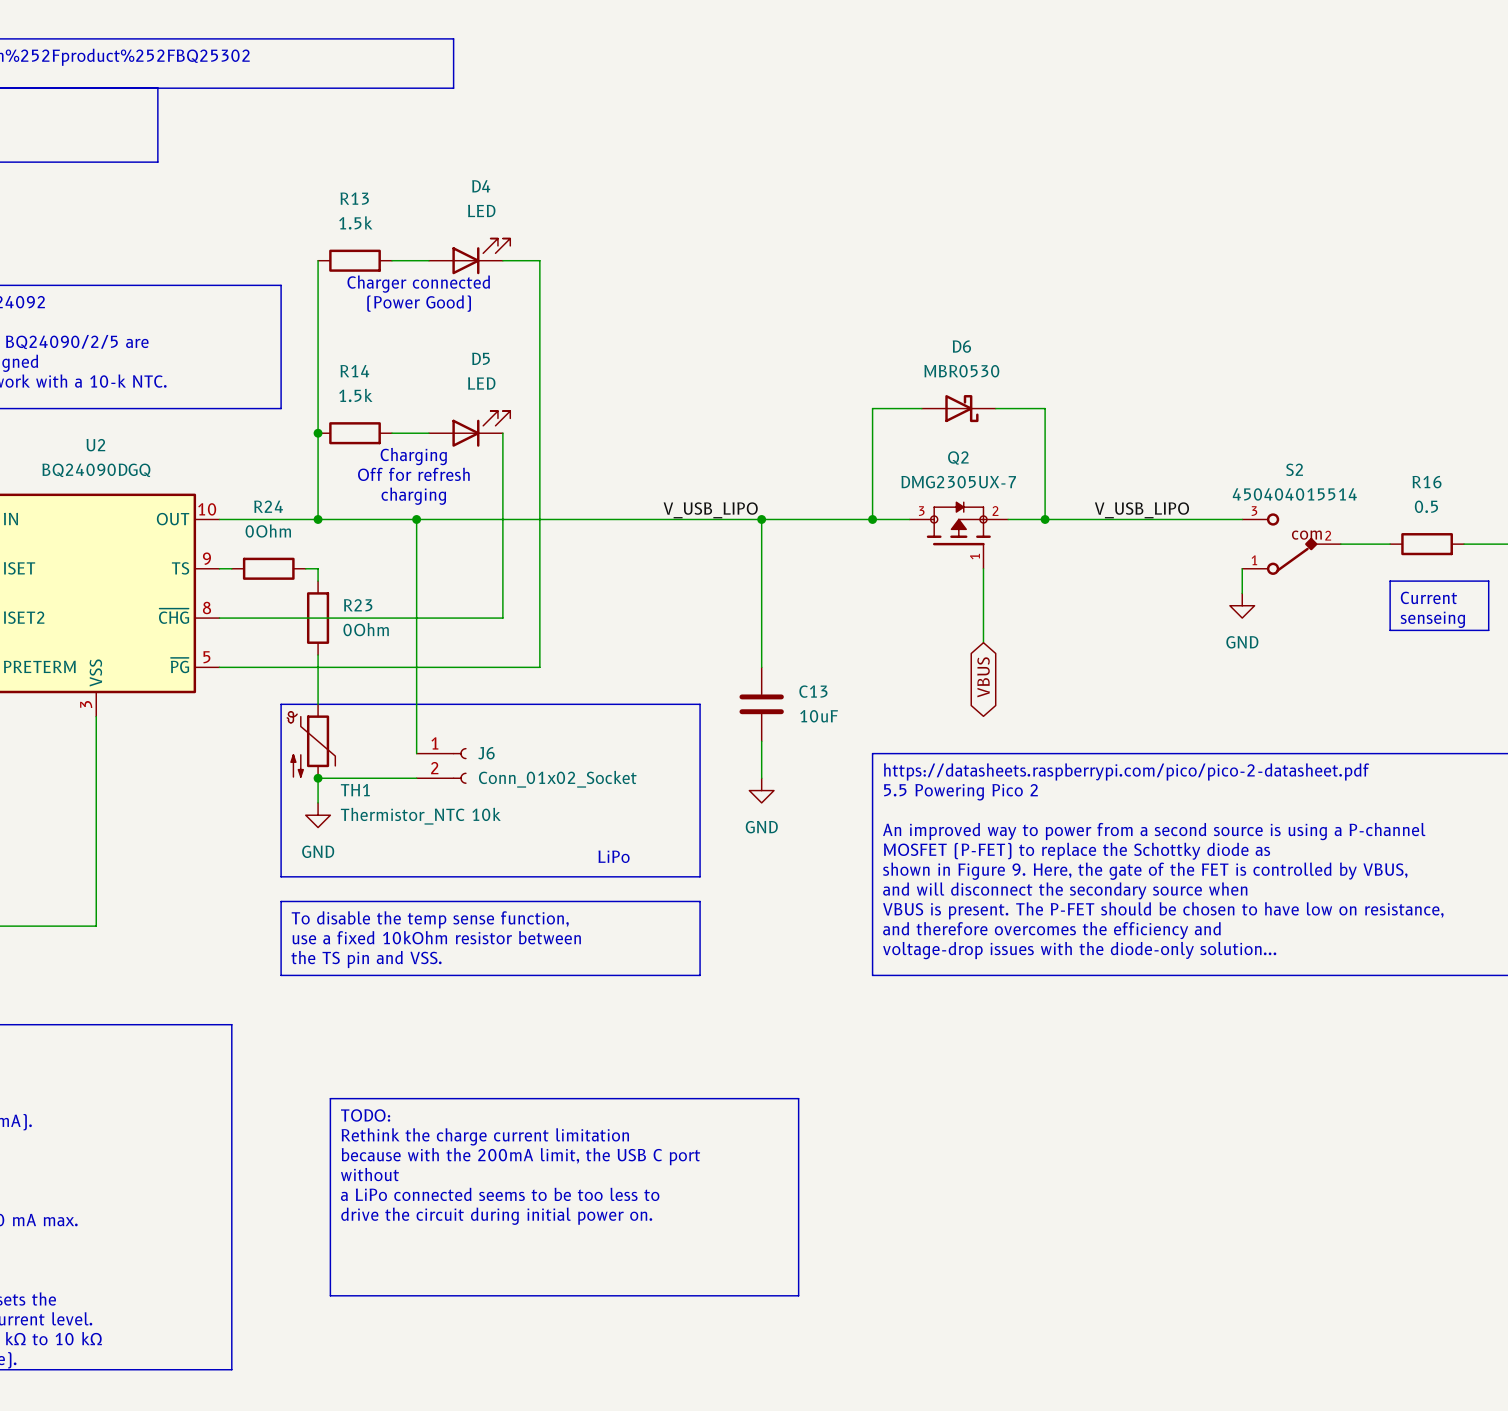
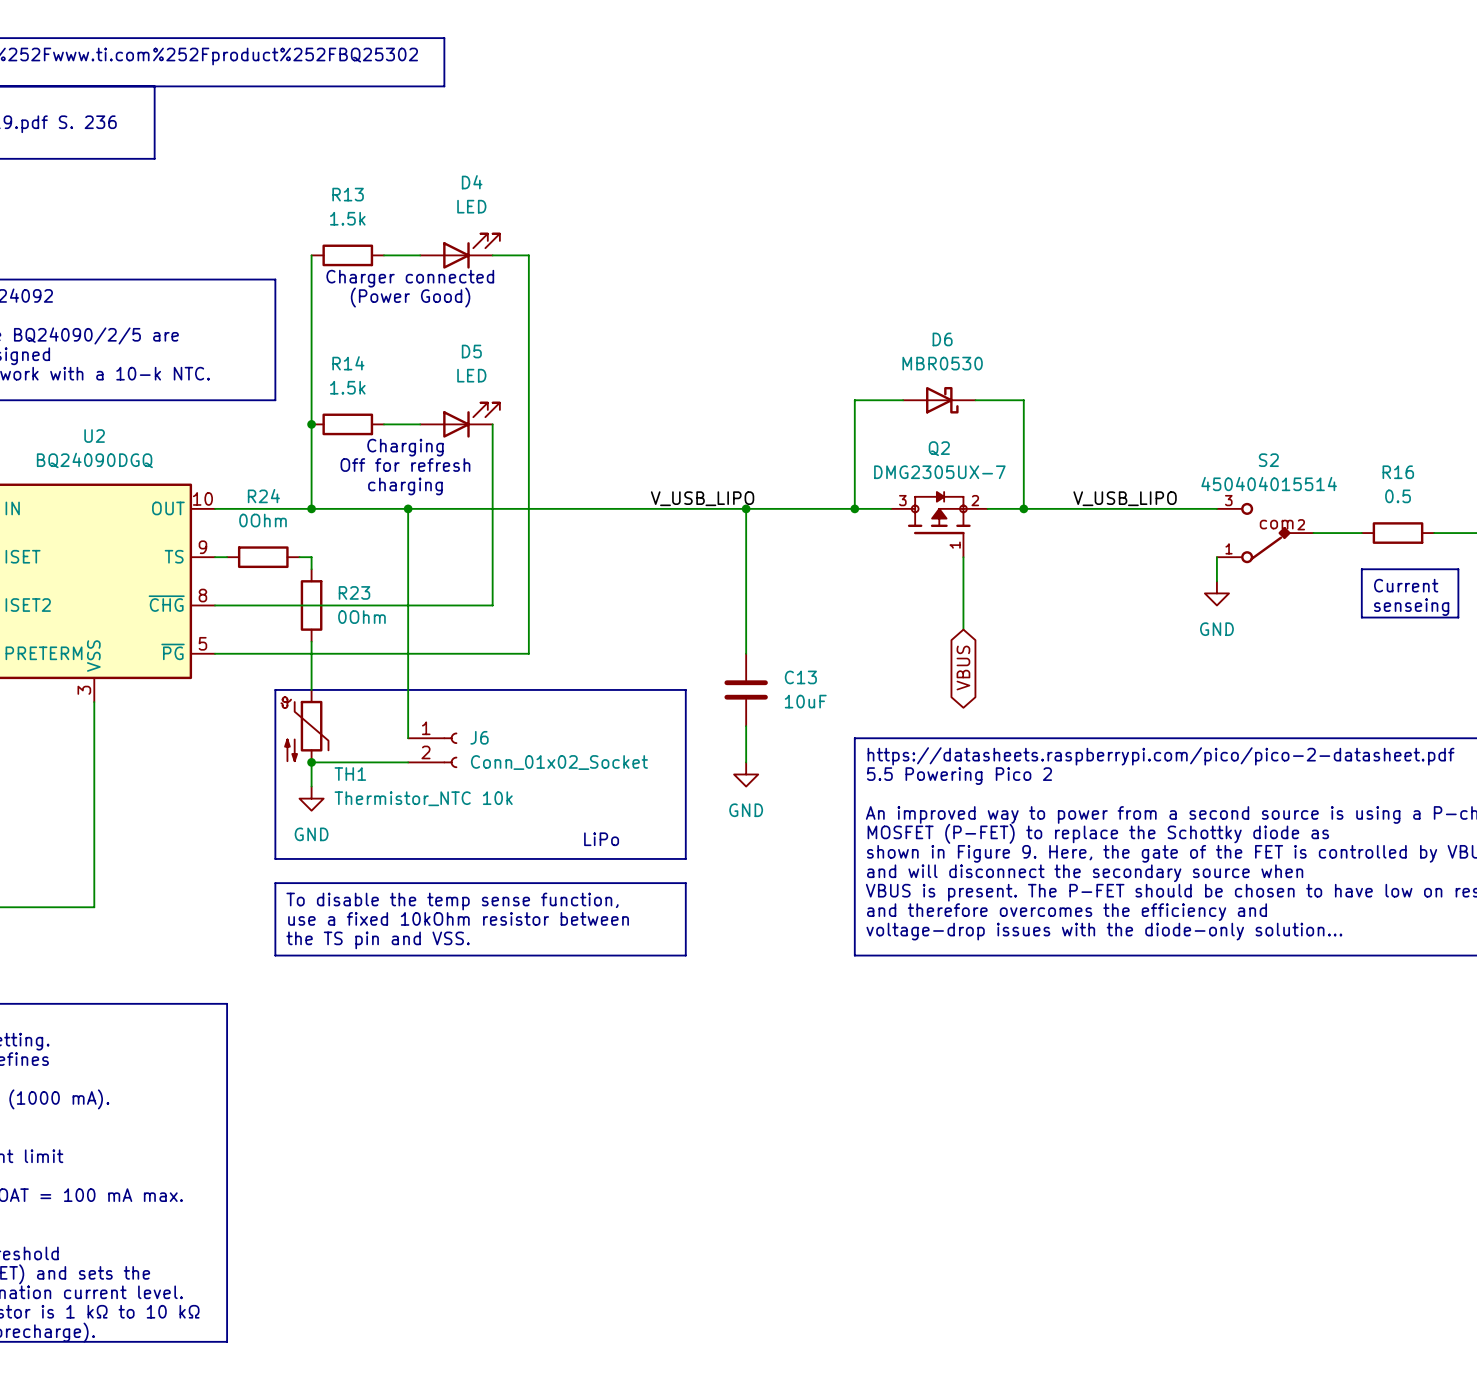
line: (330, 1098) (798, 1098) (798, 1295) (330, 1295) (330, 1098) -> none
text: TODO: (365, 1115) -> none
text: Rethink the charge current limitation (485, 1136) -> none
text: because with the 200mA limit, the USB C port (520, 1156) -> none
text: without (369, 1174) -> none
text: a LiPo connected seems to be too less to (500, 1194) -> none
text: drive the circuit during initial power on. (496, 1216) -> none

